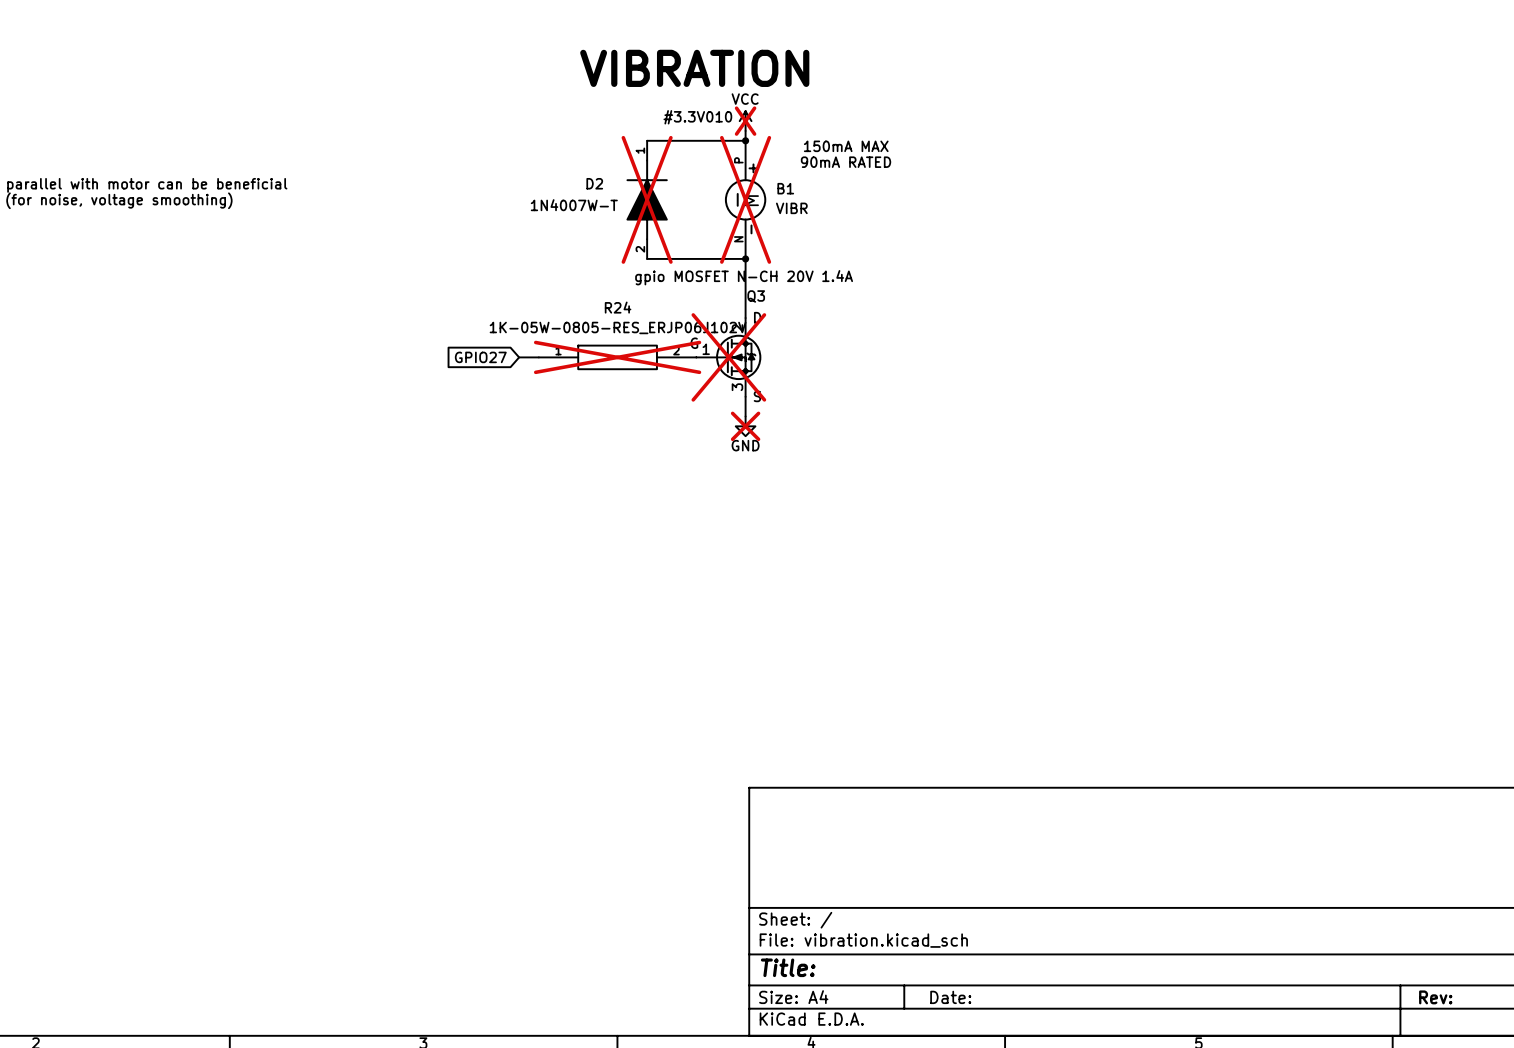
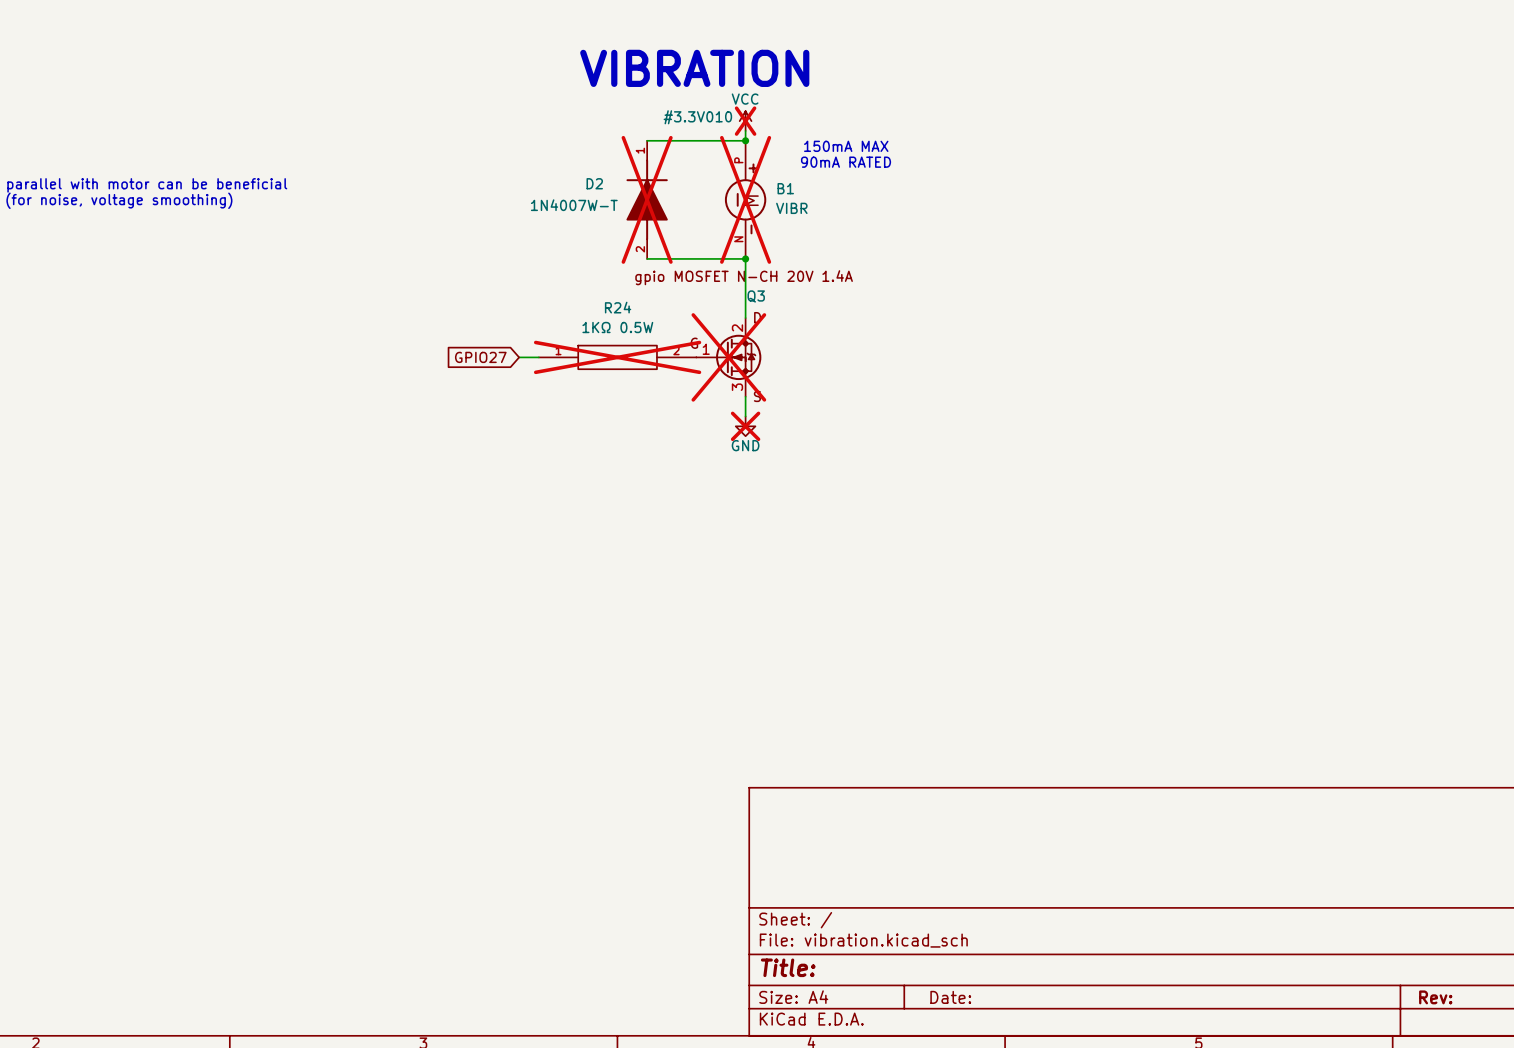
R24 value: 1K-05W-0805-RES_ERJP06J102V (618, 327) -> 1KΩ 0.5W (617, 327)

